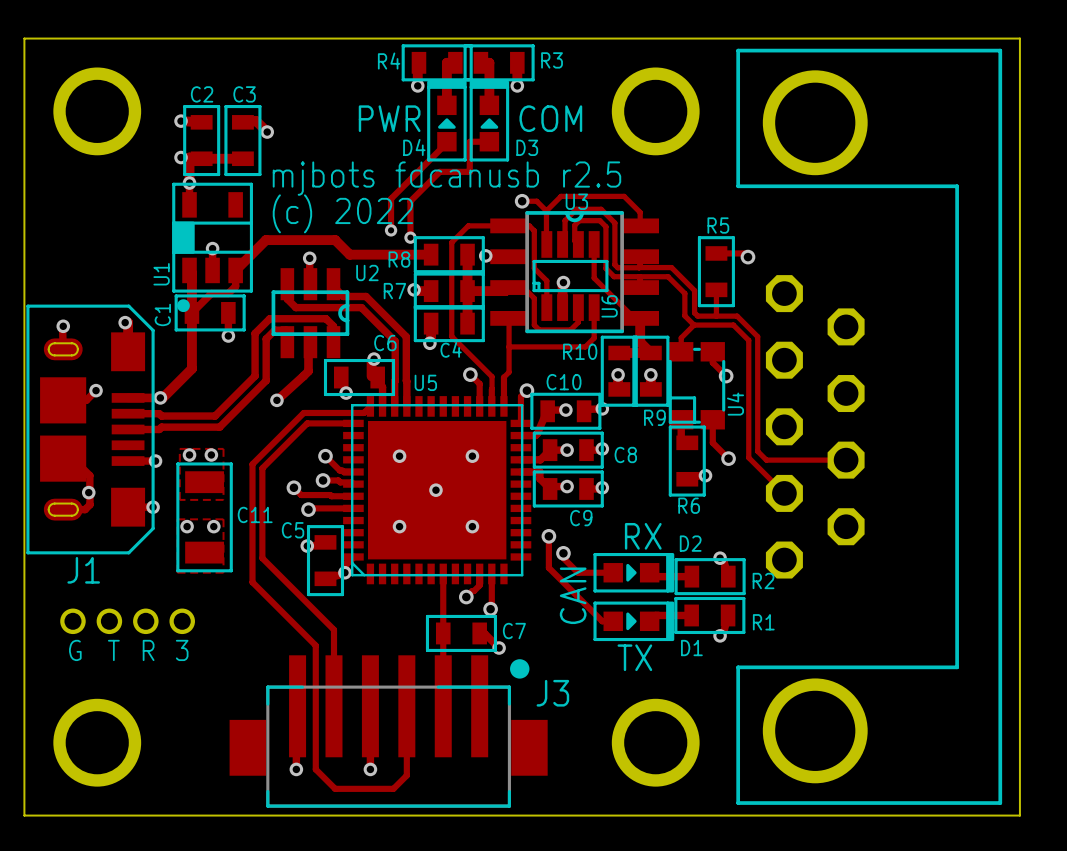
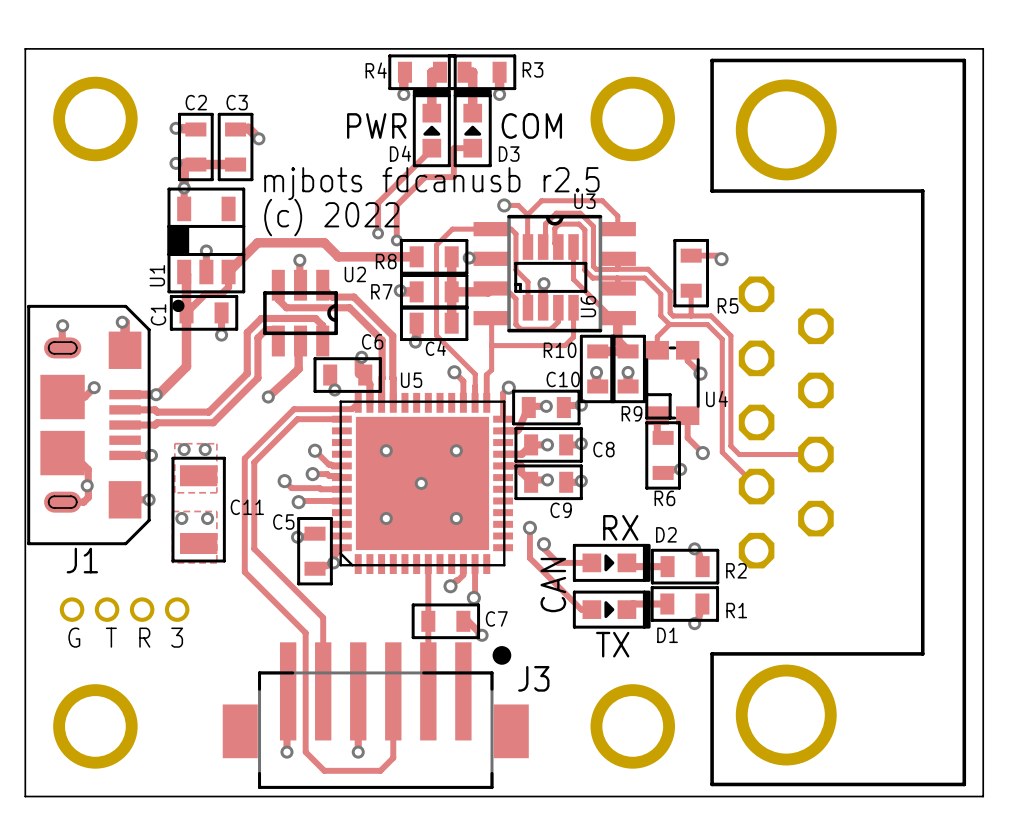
U3 name position: U3 (576, 201) -> U3 (584, 201)
R5 name position: R5 (718, 225) -> R5 (728, 305)
C10 name position: C10 (564, 382) -> C10 (563, 379)
U4 name rotation: 0° (735, 404) -> 90° clockwise (716, 399)

